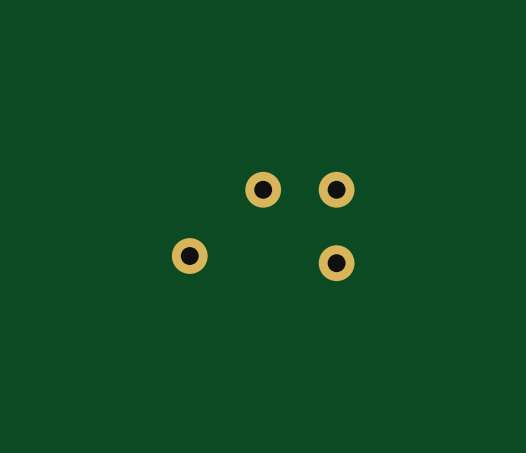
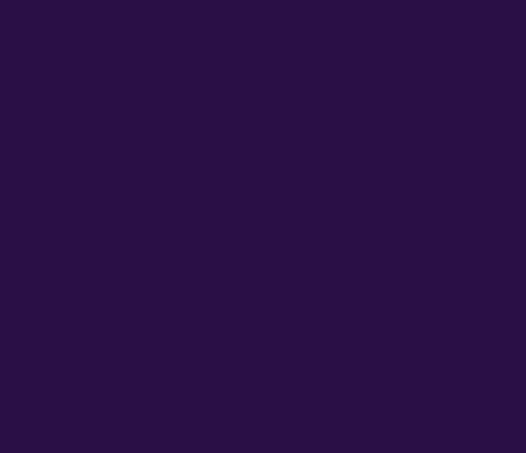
part: (263, 189) -> none
part: (336, 189) -> none
part: (189, 256) -> none
part: (336, 263) -> none

